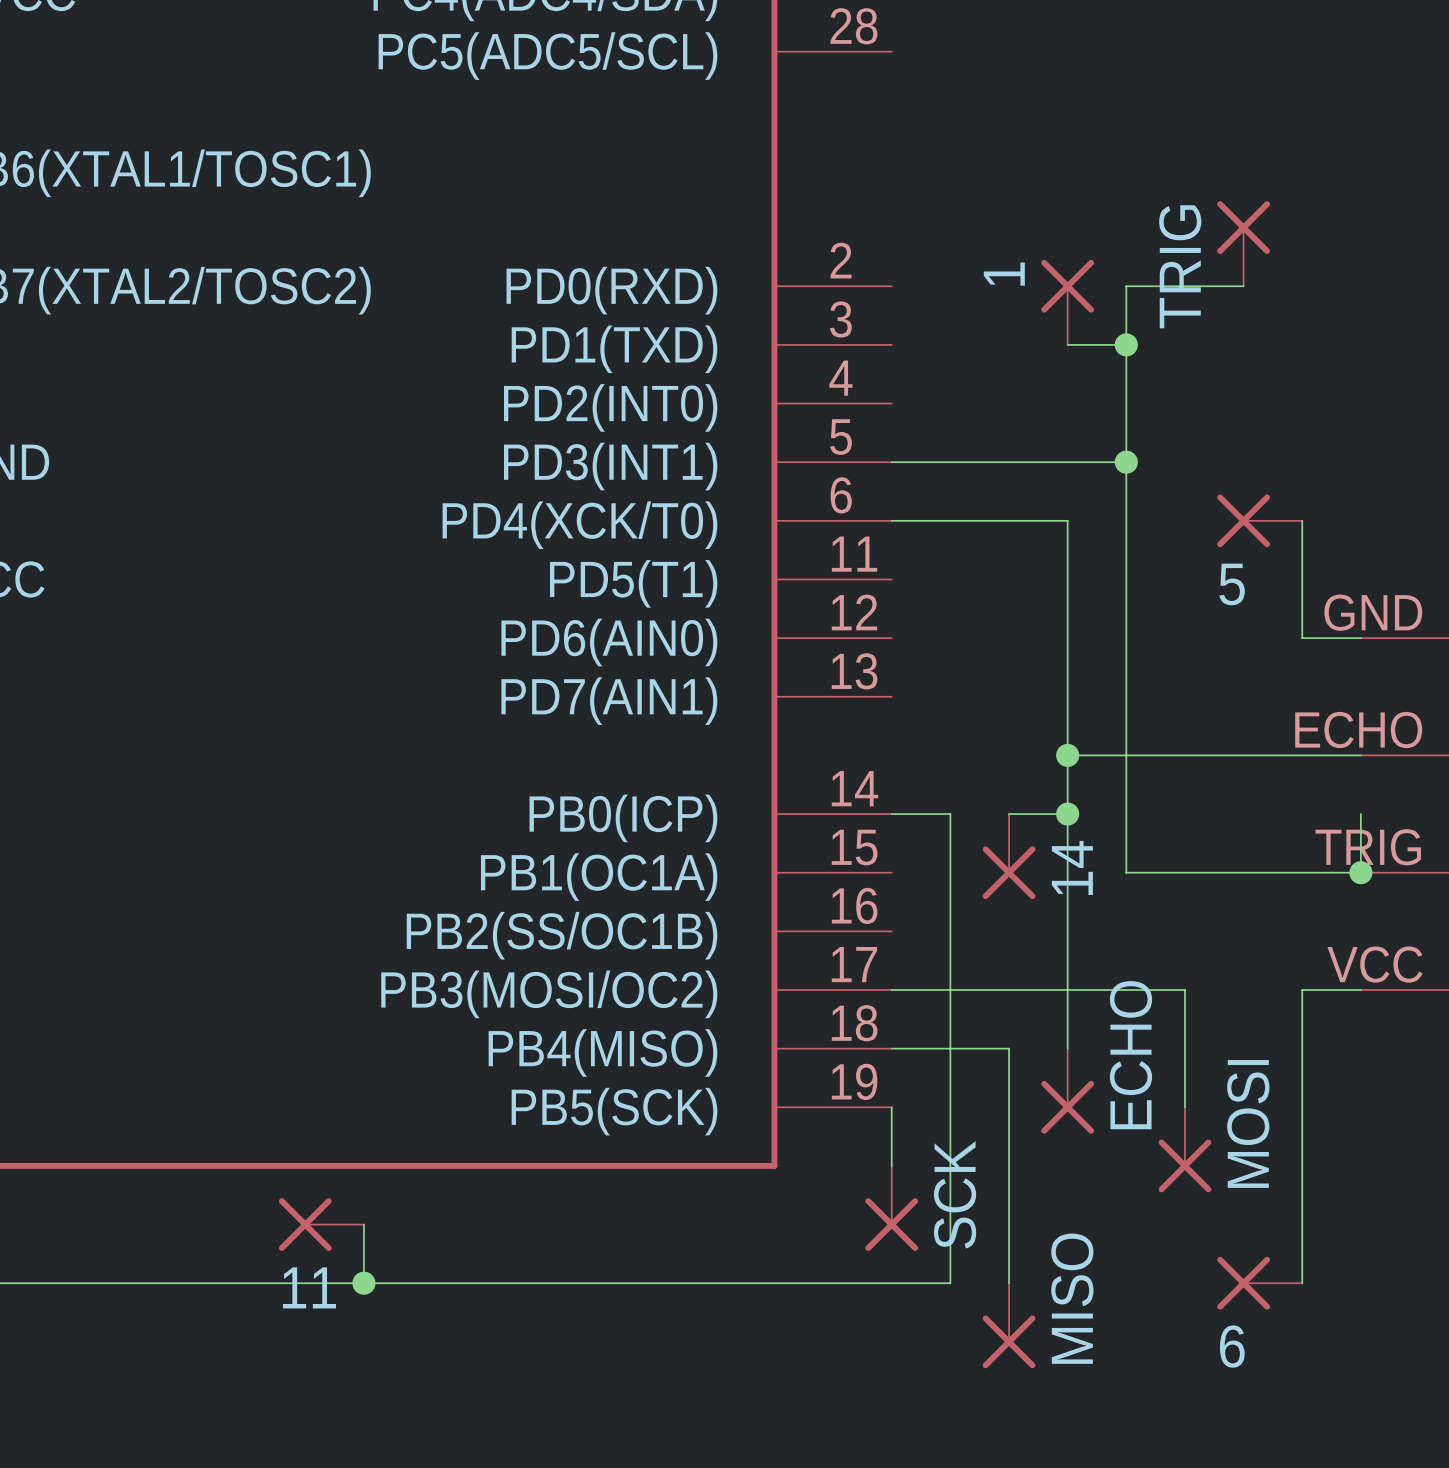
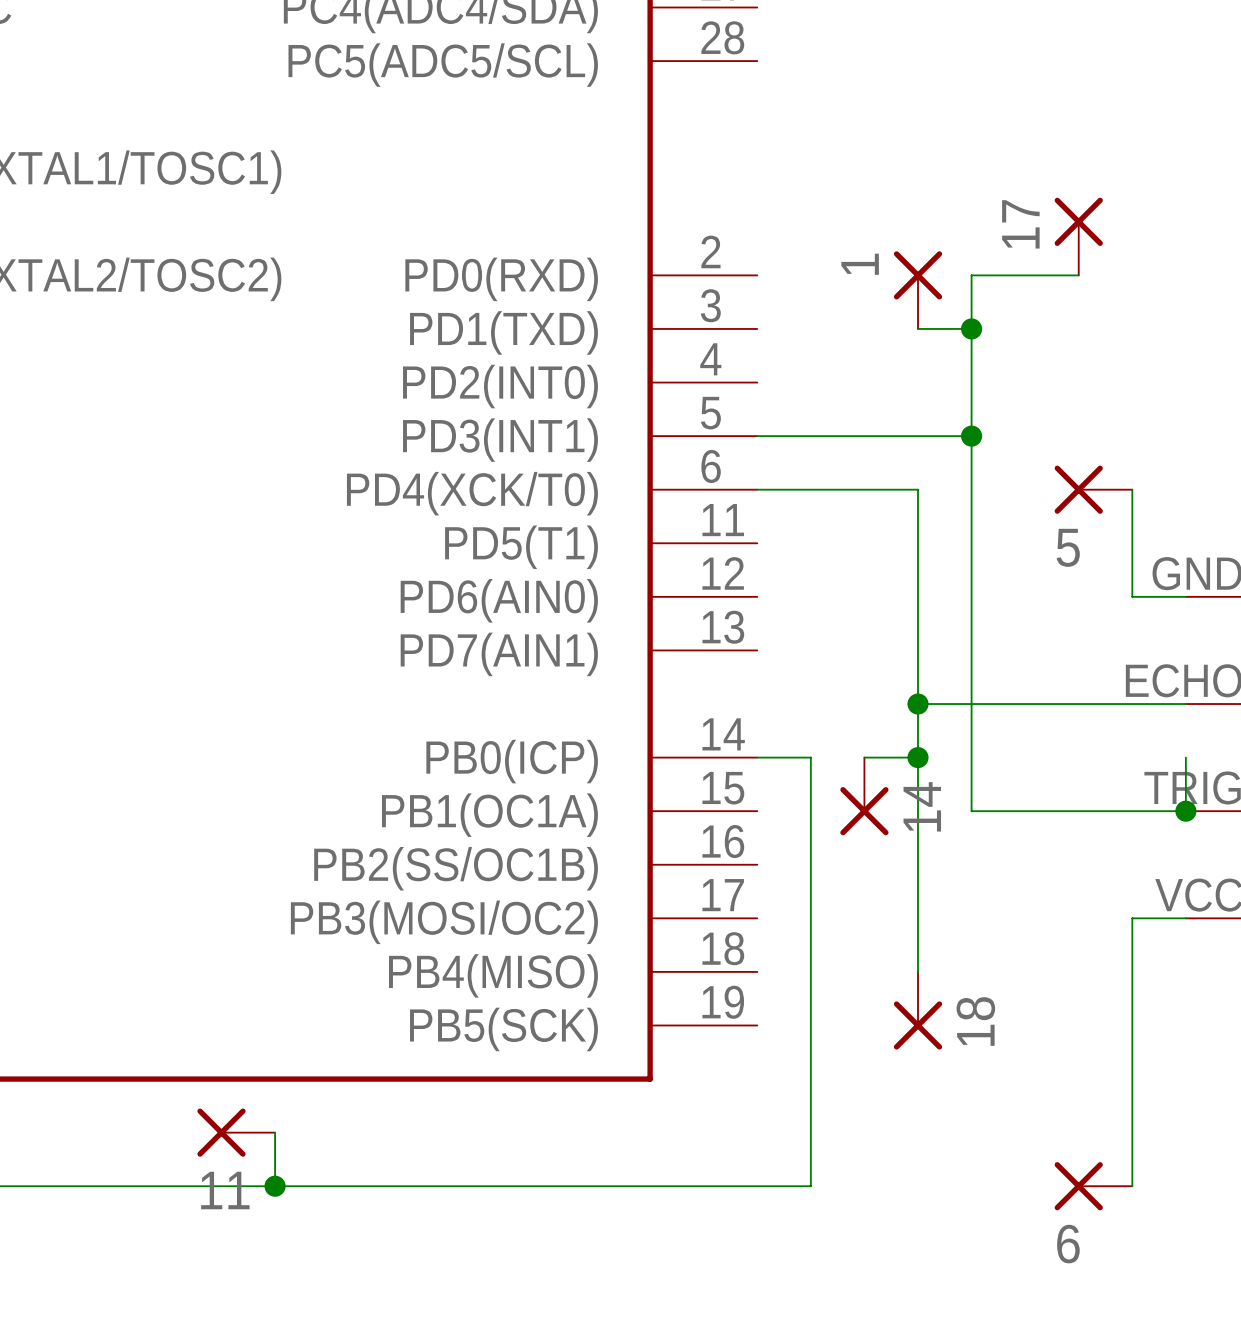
TRIG name: TRIG (1180, 266) -> 17 (1020, 224)
wire: (891, 989) (1184, 989) (1184, 1107) -> none
wire: (891, 1048) (1009, 1048) (1009, 1283) -> none
ECHO name: ECHO (1130, 1055) -> 18 (975, 1021)
wire: (891, 1107) (891, 1165) -> none
MOSI: (1184, 1149) -> none
SCK: (891, 1208) -> none
MISO: (1009, 1325) -> none

